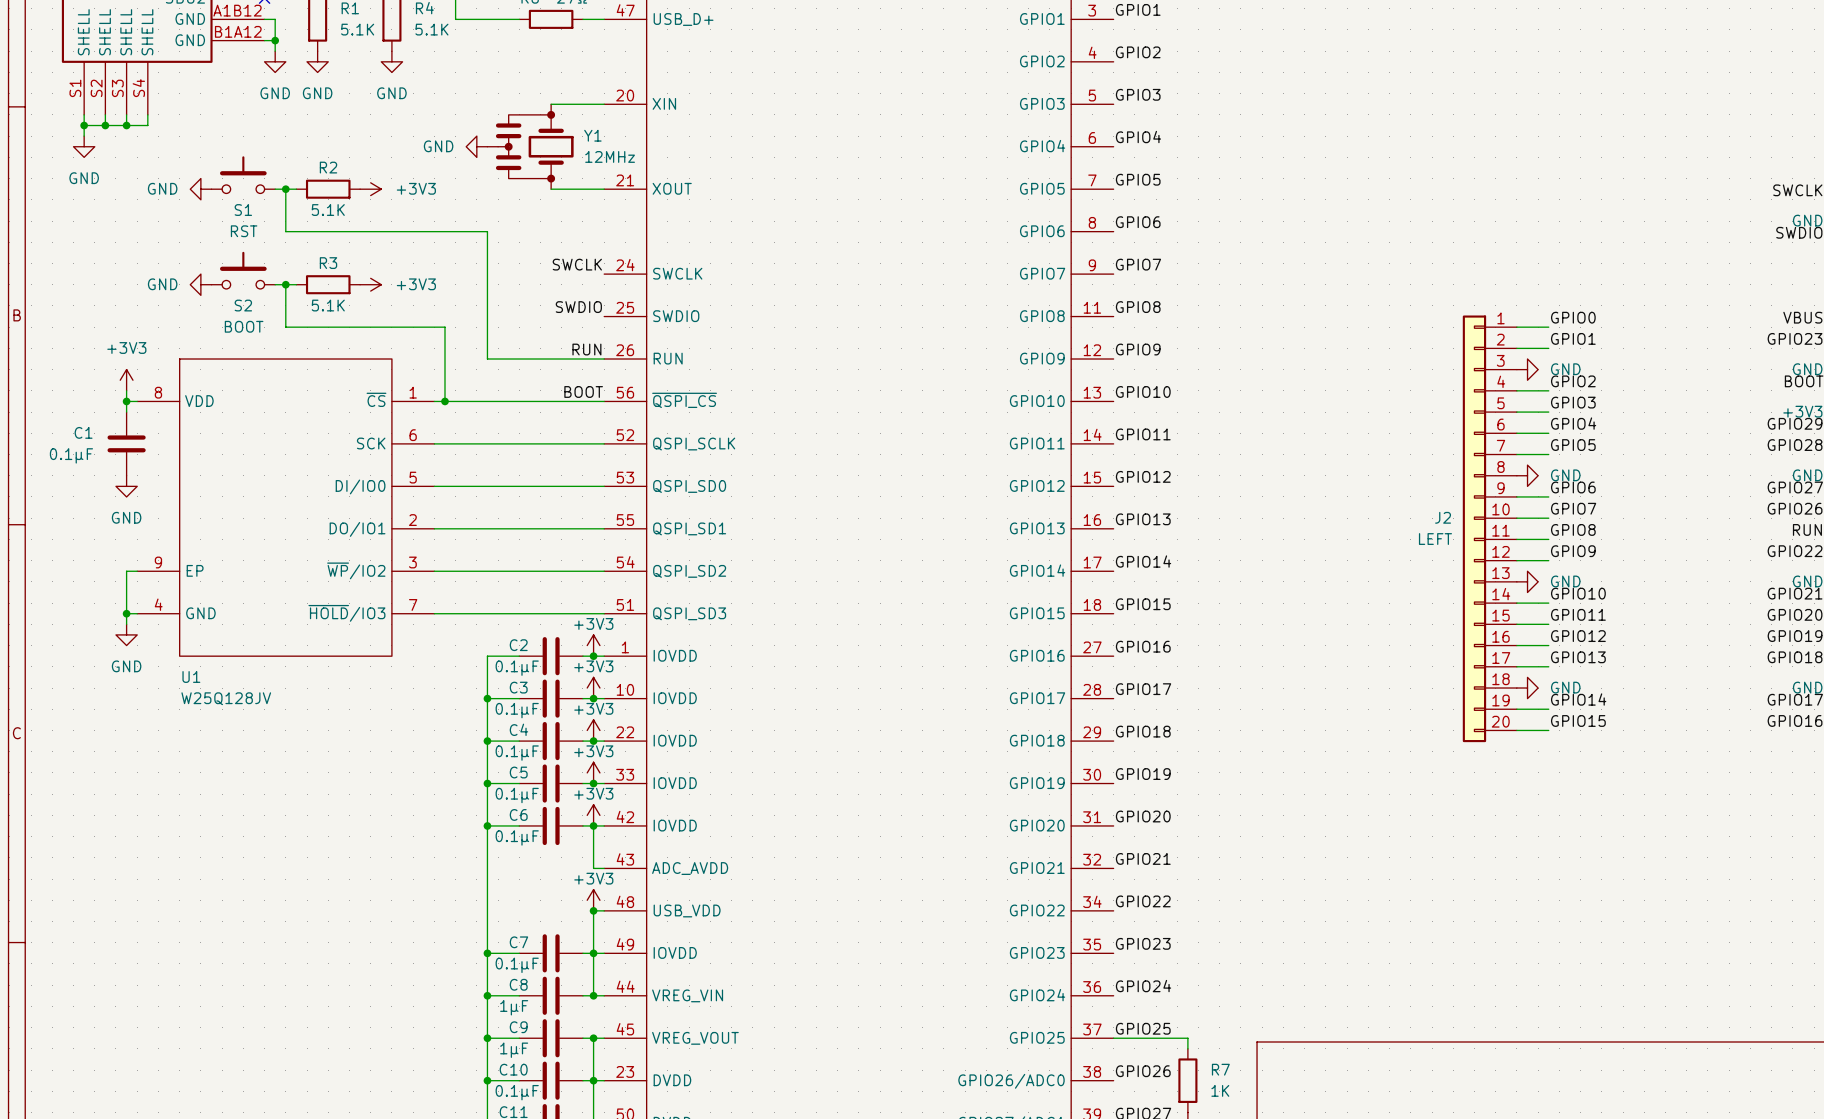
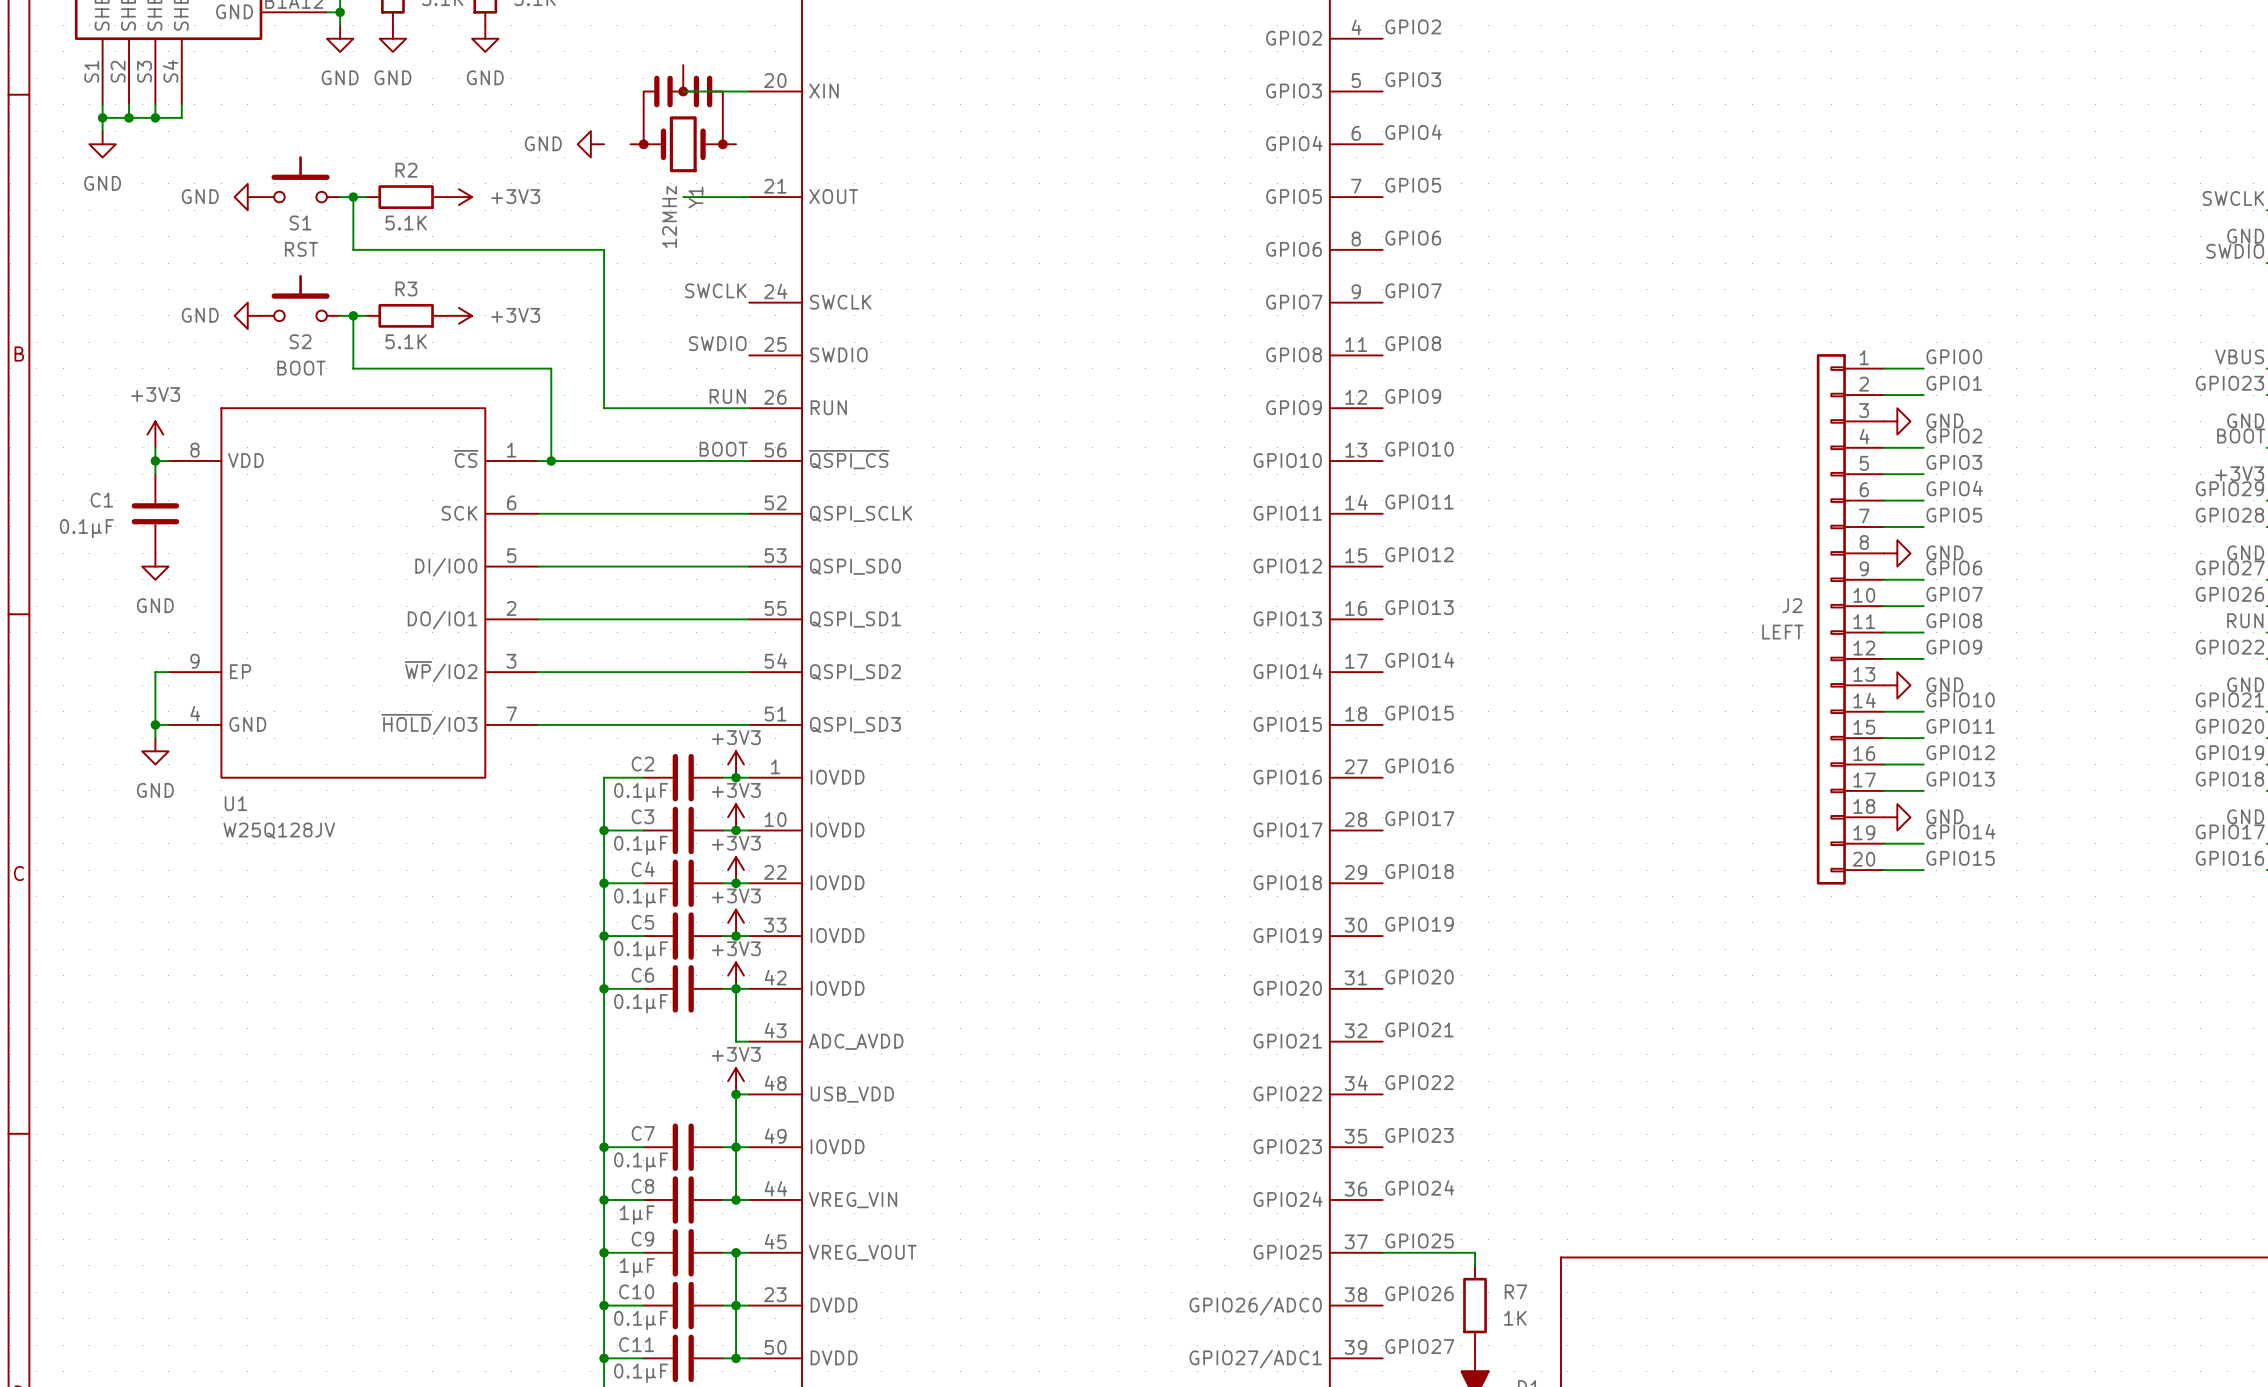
Y1 rotation: 0° (534, 146) -> 90° clockwise (683, 123)

